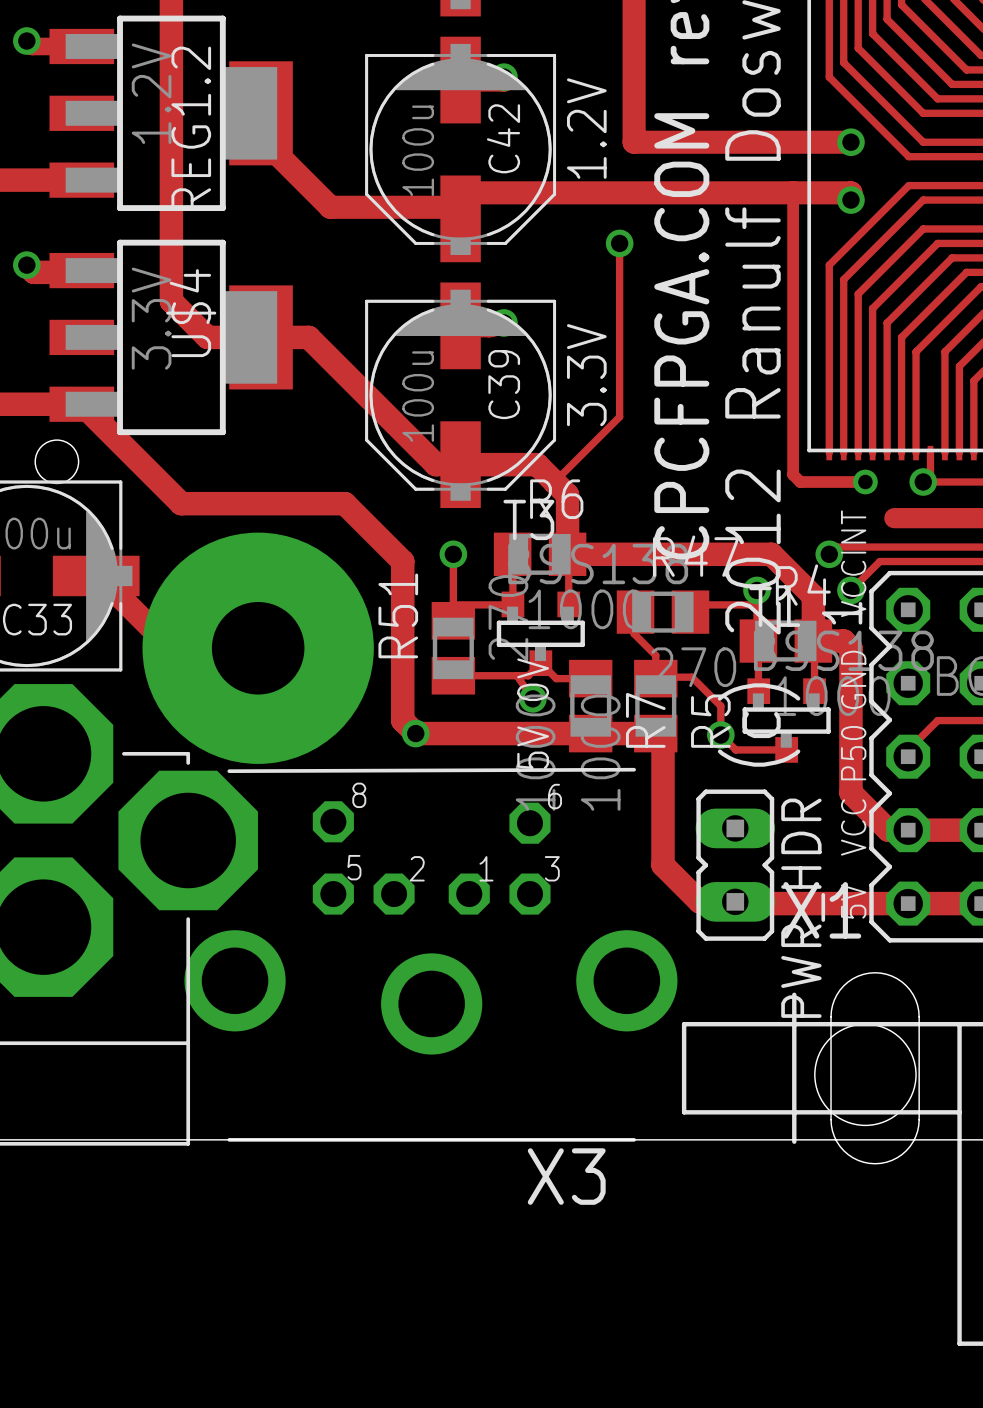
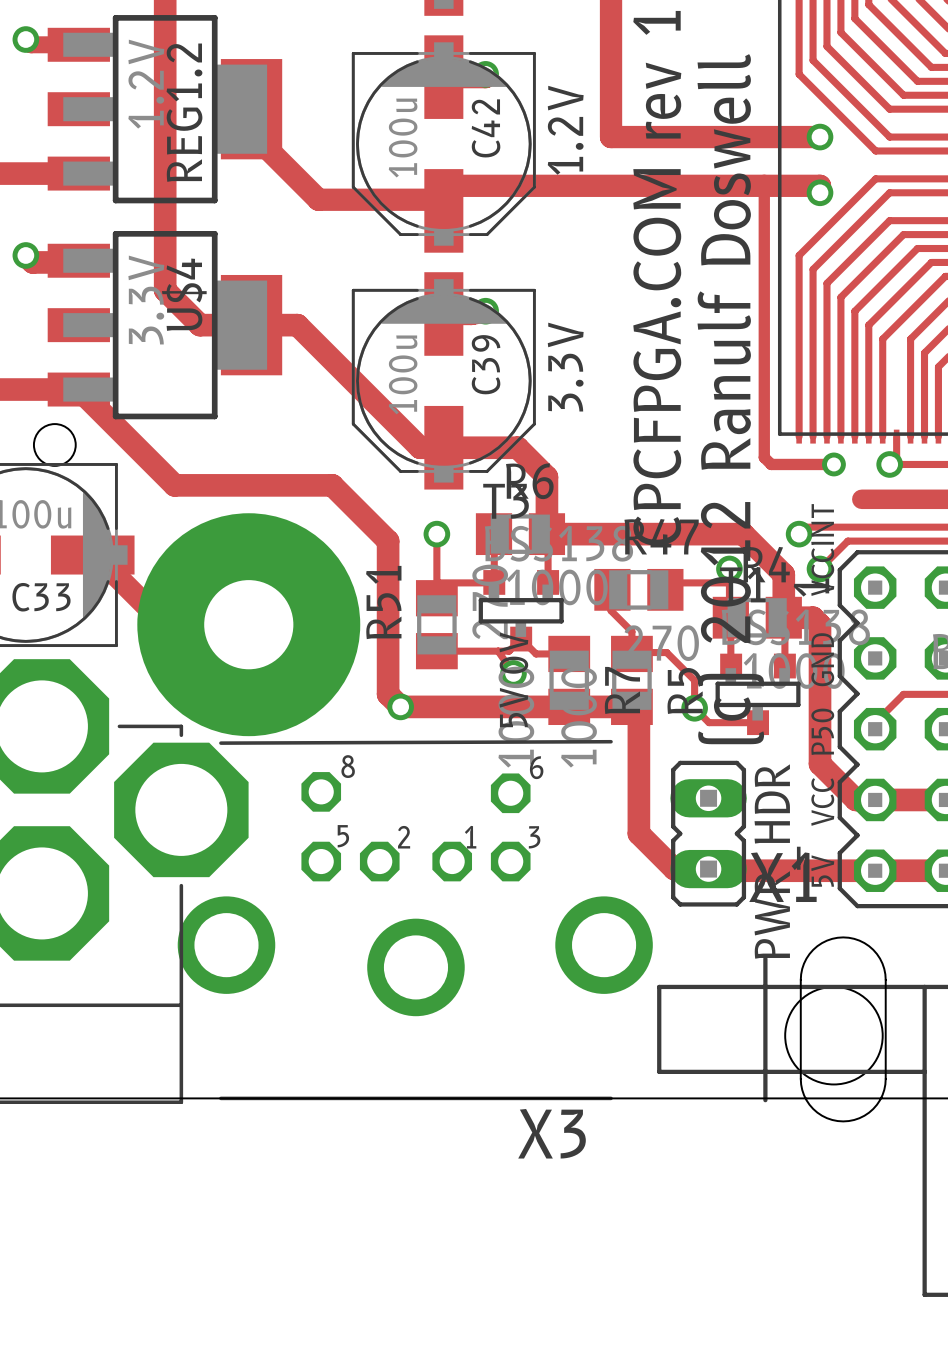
track: (619, 243) (619, 416) (554, 482) -> none
via: (619, 243) -> none

